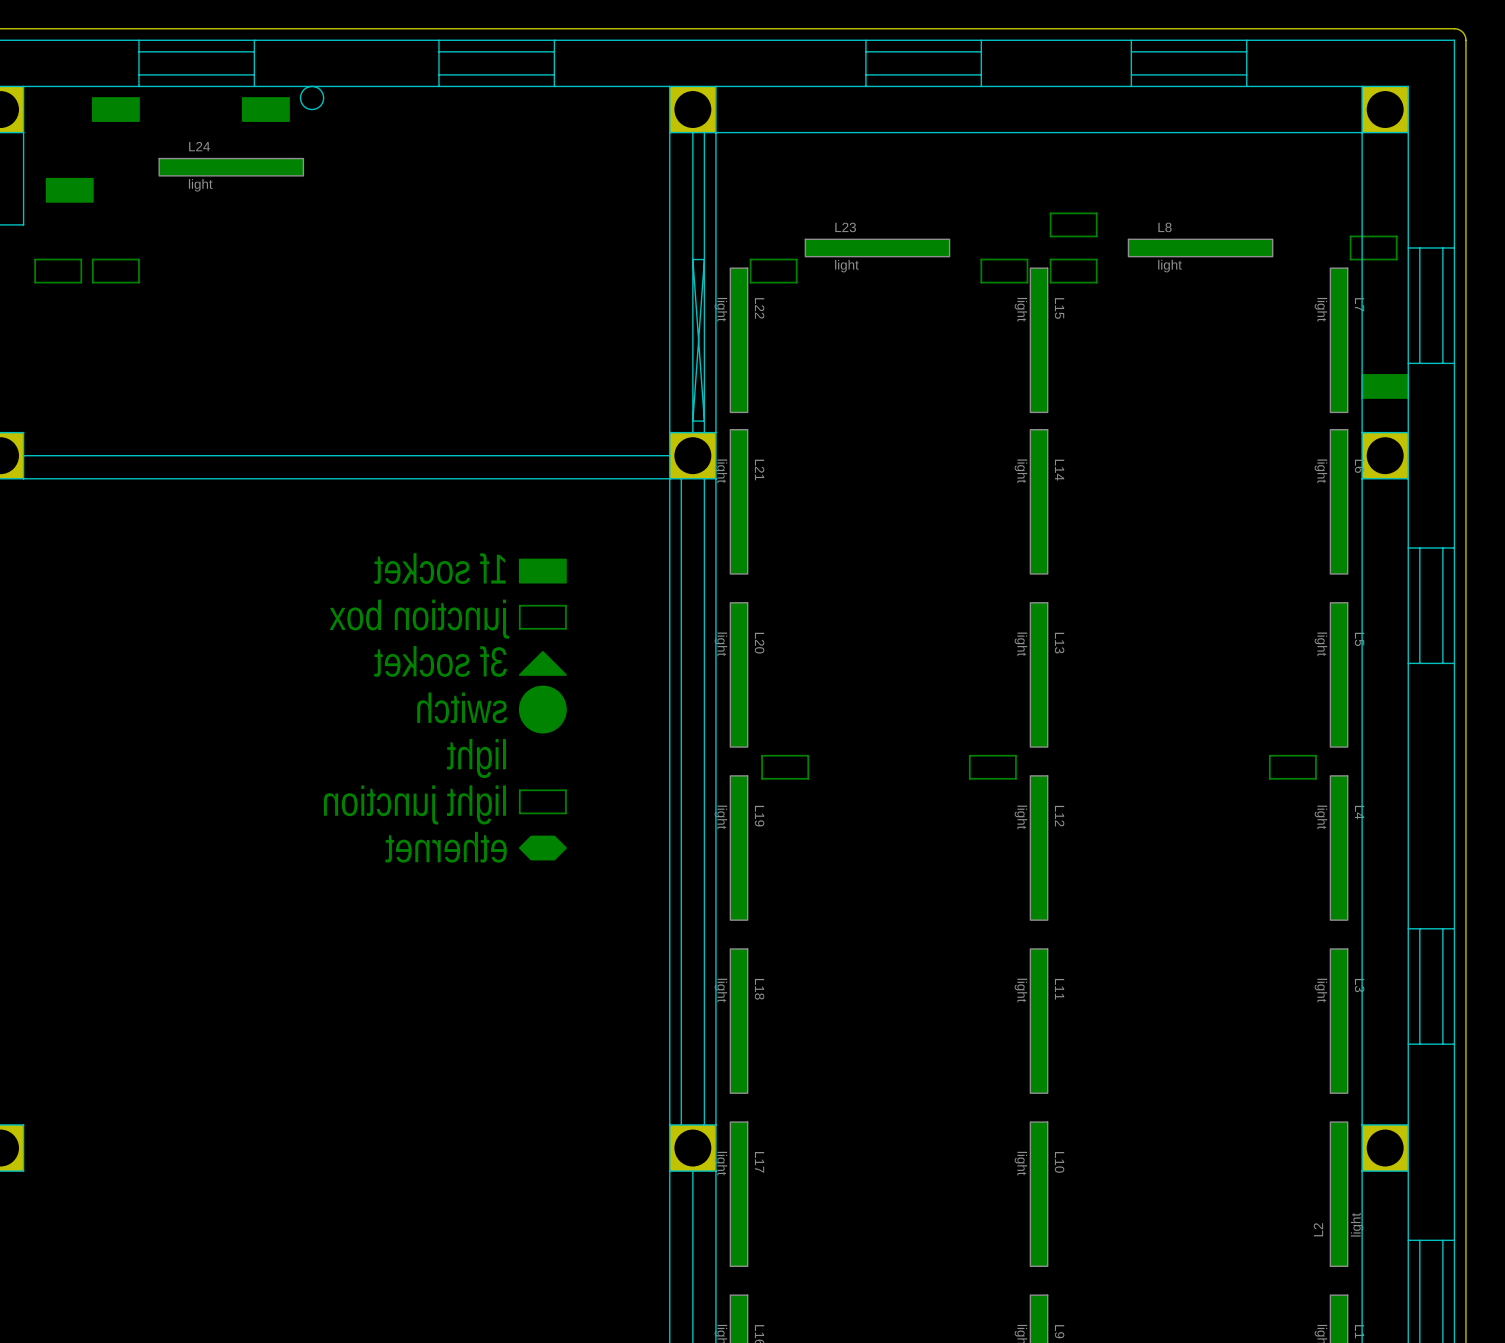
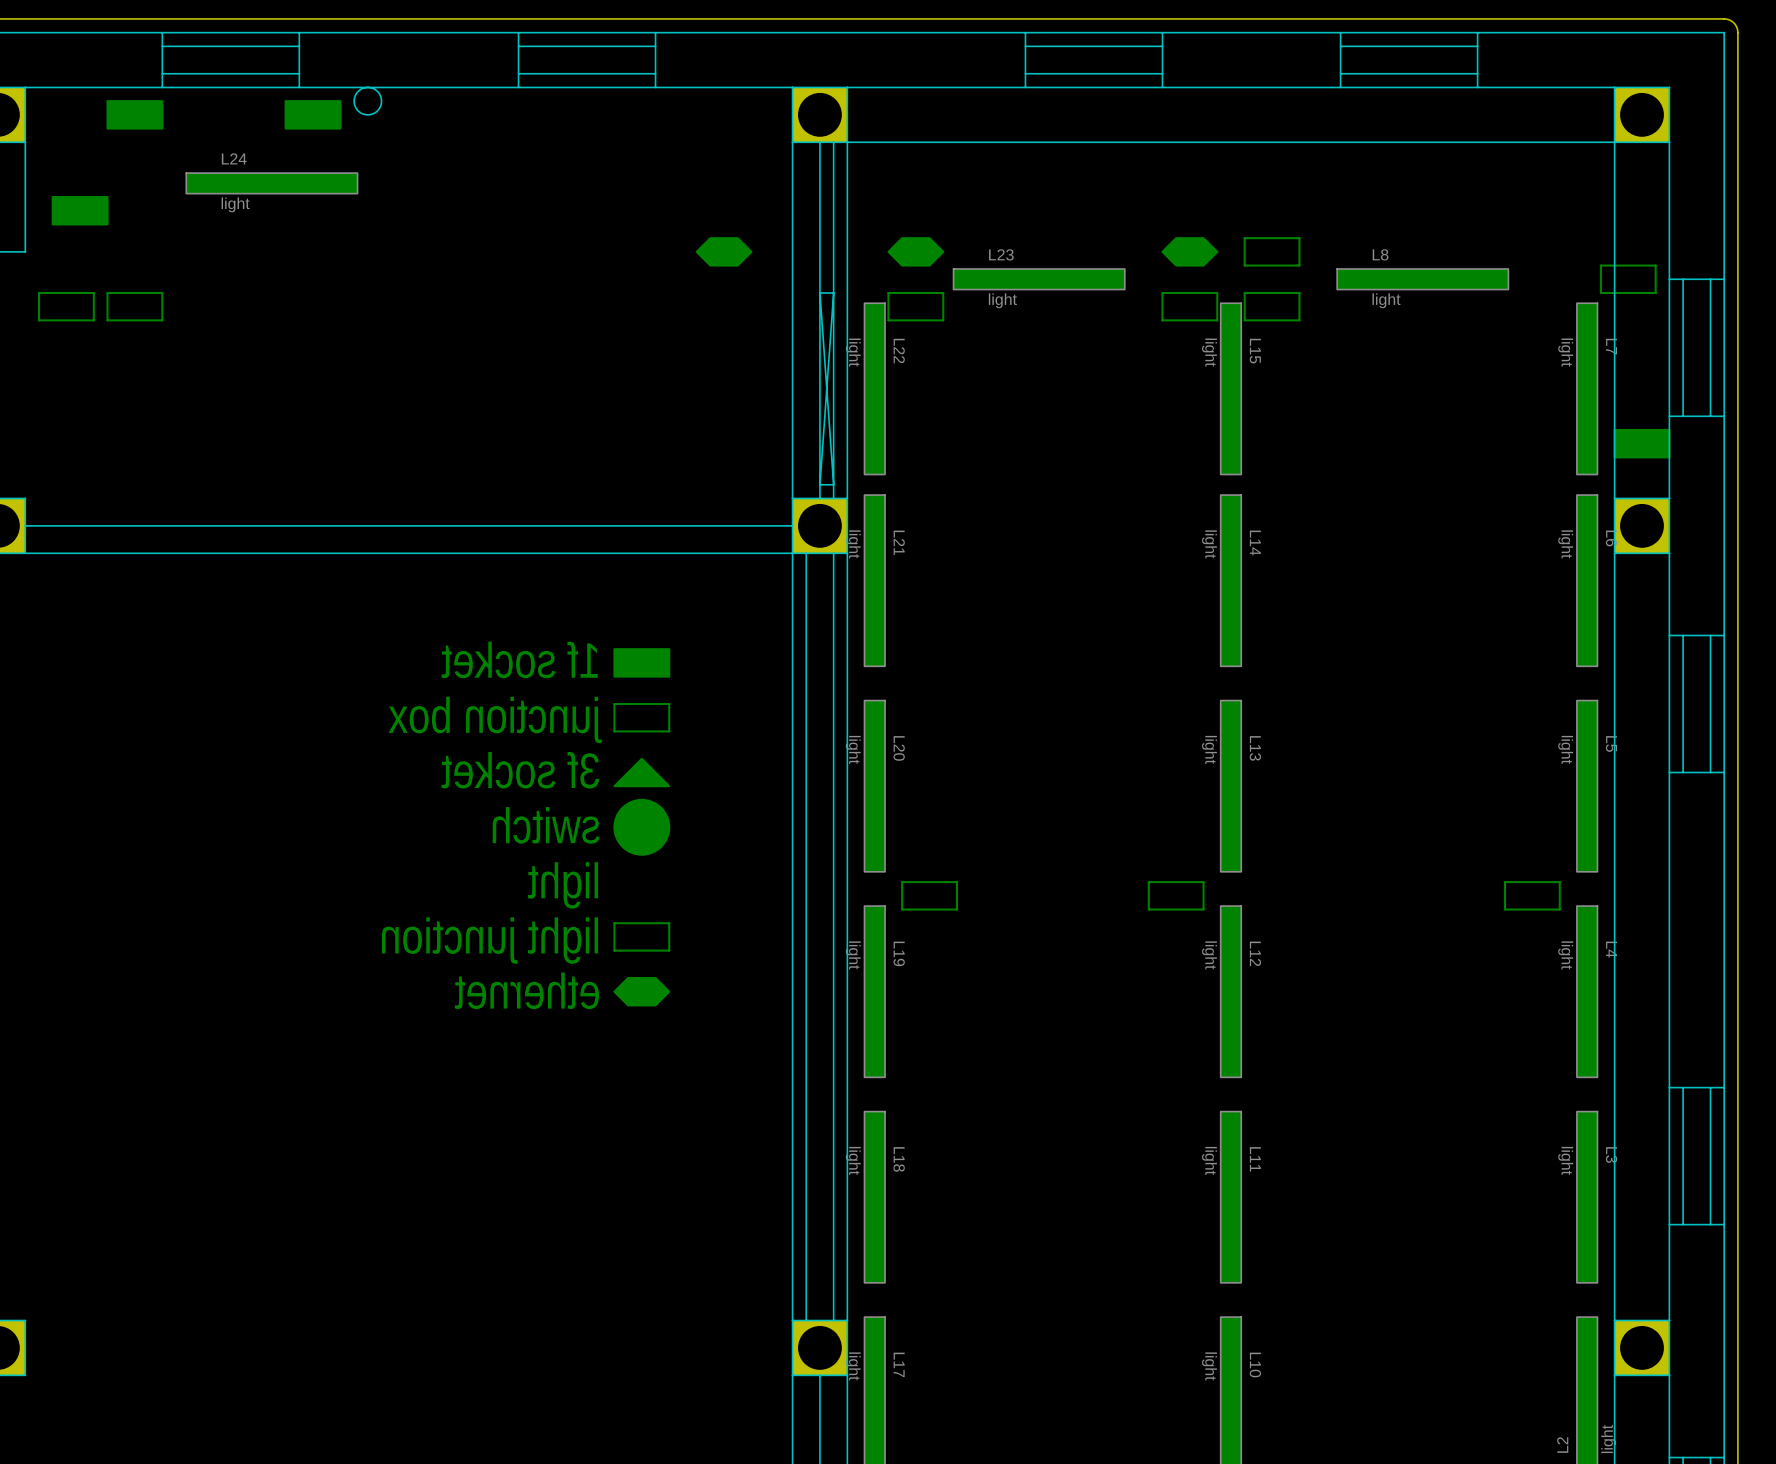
drawing: none -> [695, 237, 753, 267]
drawing: none -> [887, 237, 945, 267]
drawing: none -> [1161, 237, 1219, 267]

